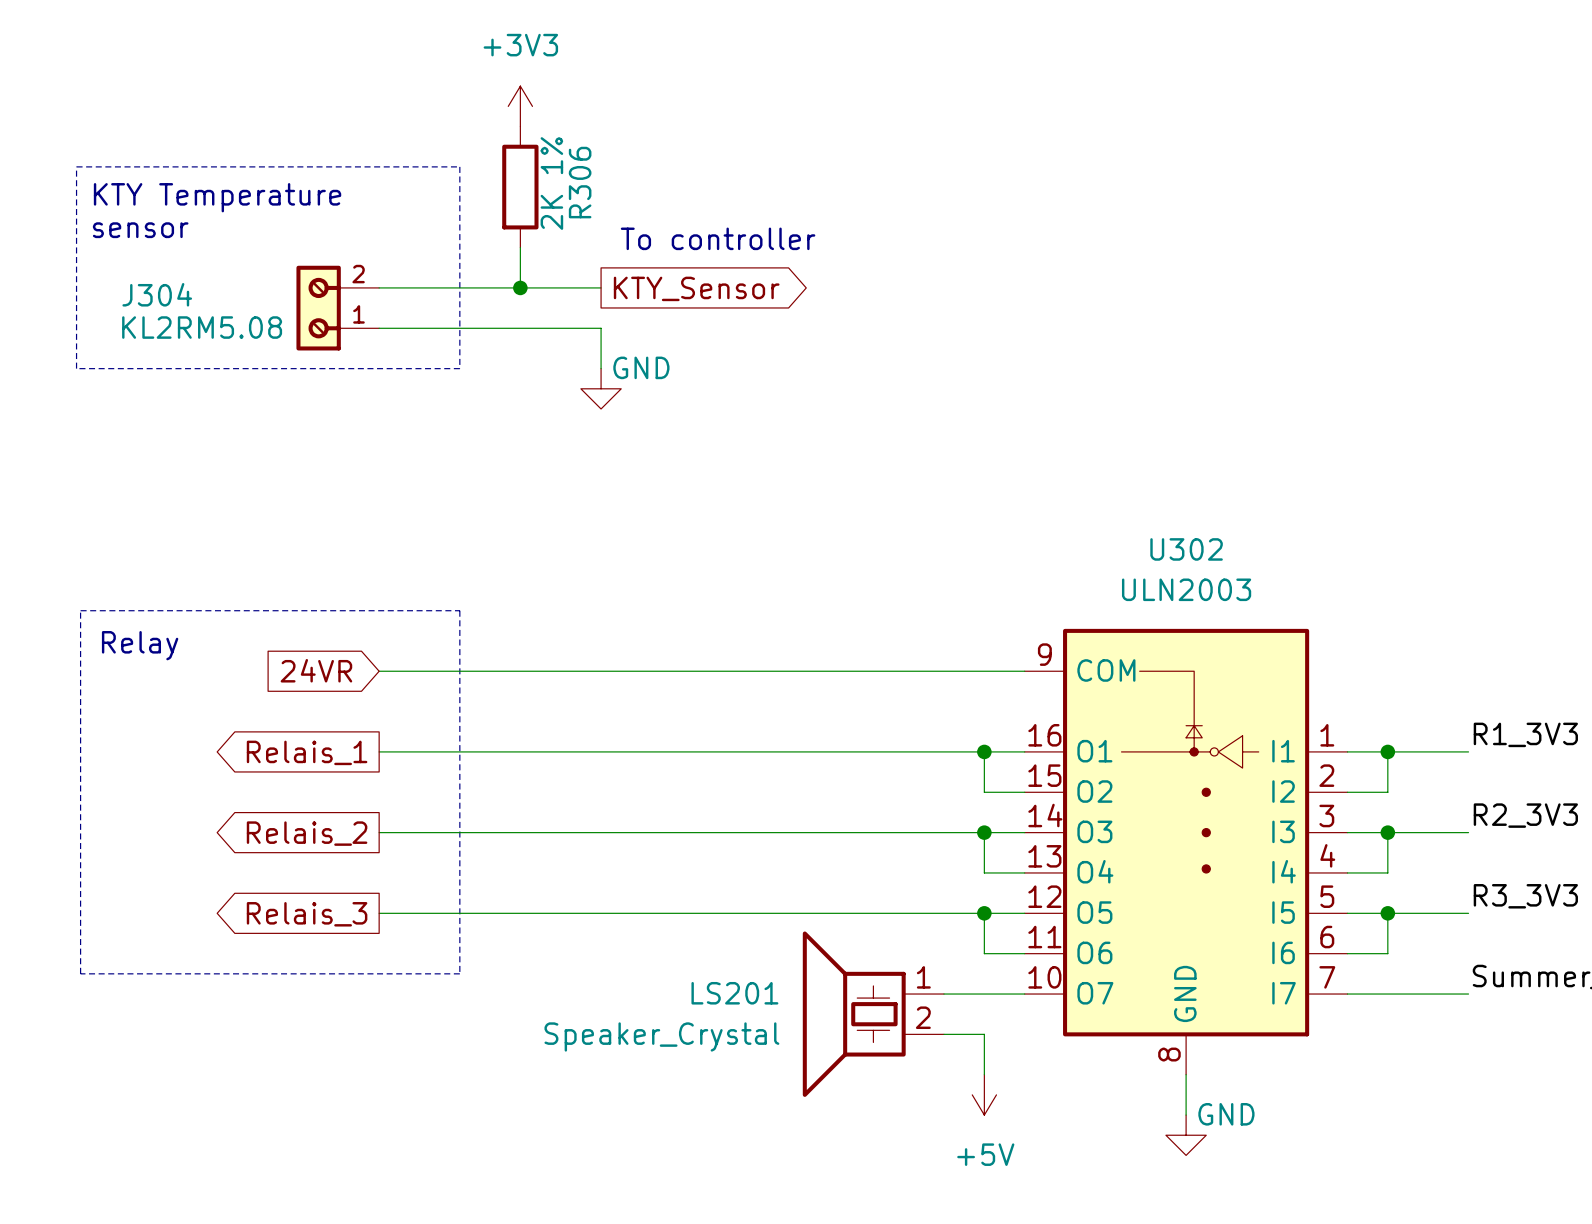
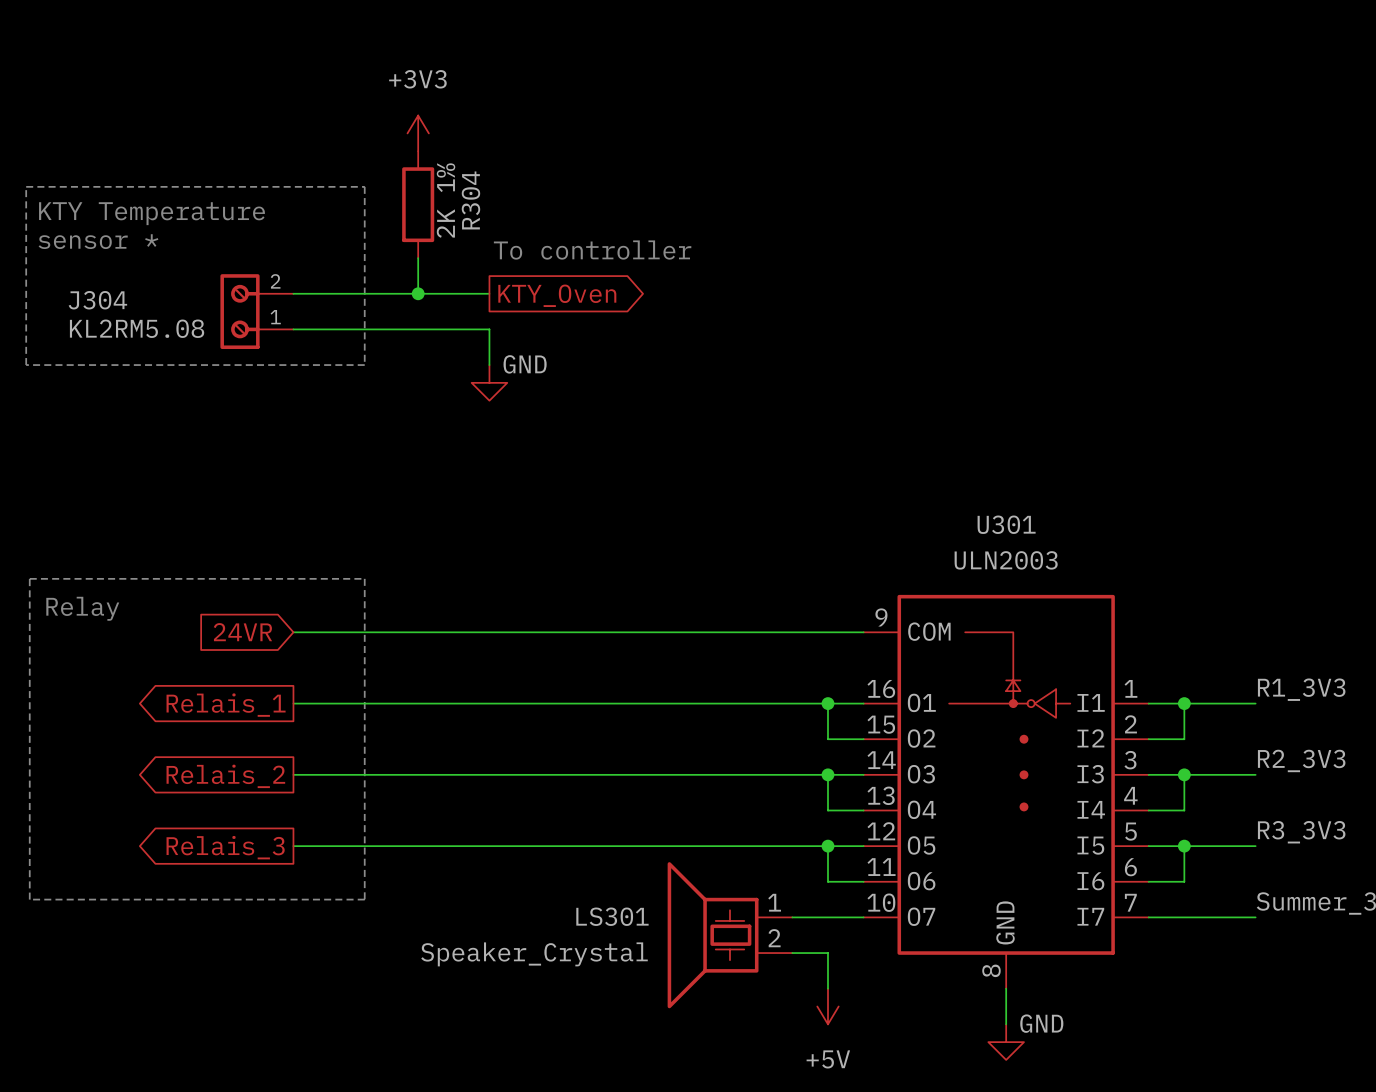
R306 name: R306 (580, 182) -> R304 (470, 200)
text: sensor (140, 230) -> sensor * (98, 241)
global label: KTY_Sensor (696, 288) -> KTY_Oven (557, 295)
U302 name: U302 (1186, 549) -> U301 (1006, 524)
LS201 name: LS201 (734, 993) -> LS301 (612, 916)

